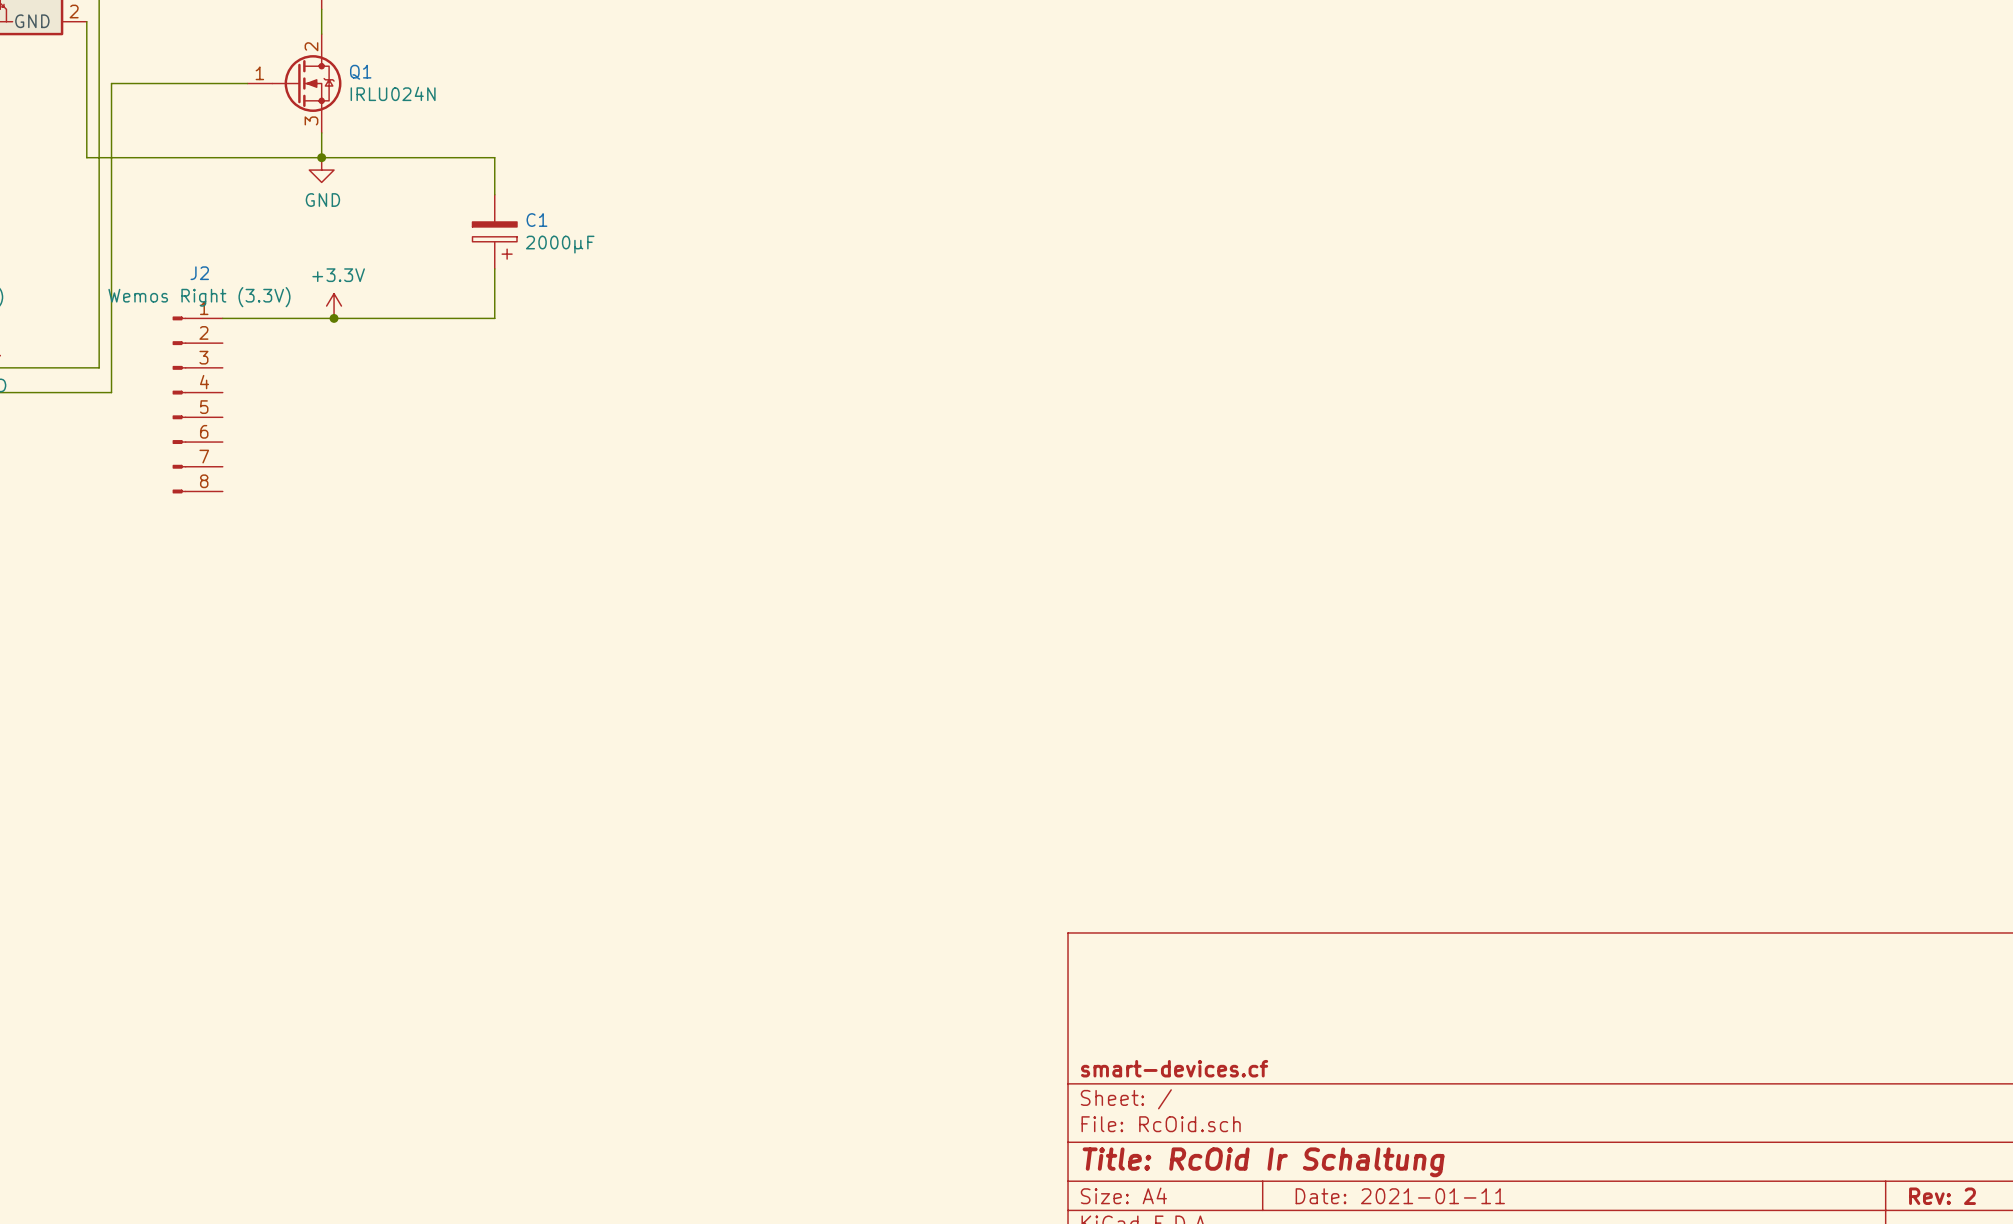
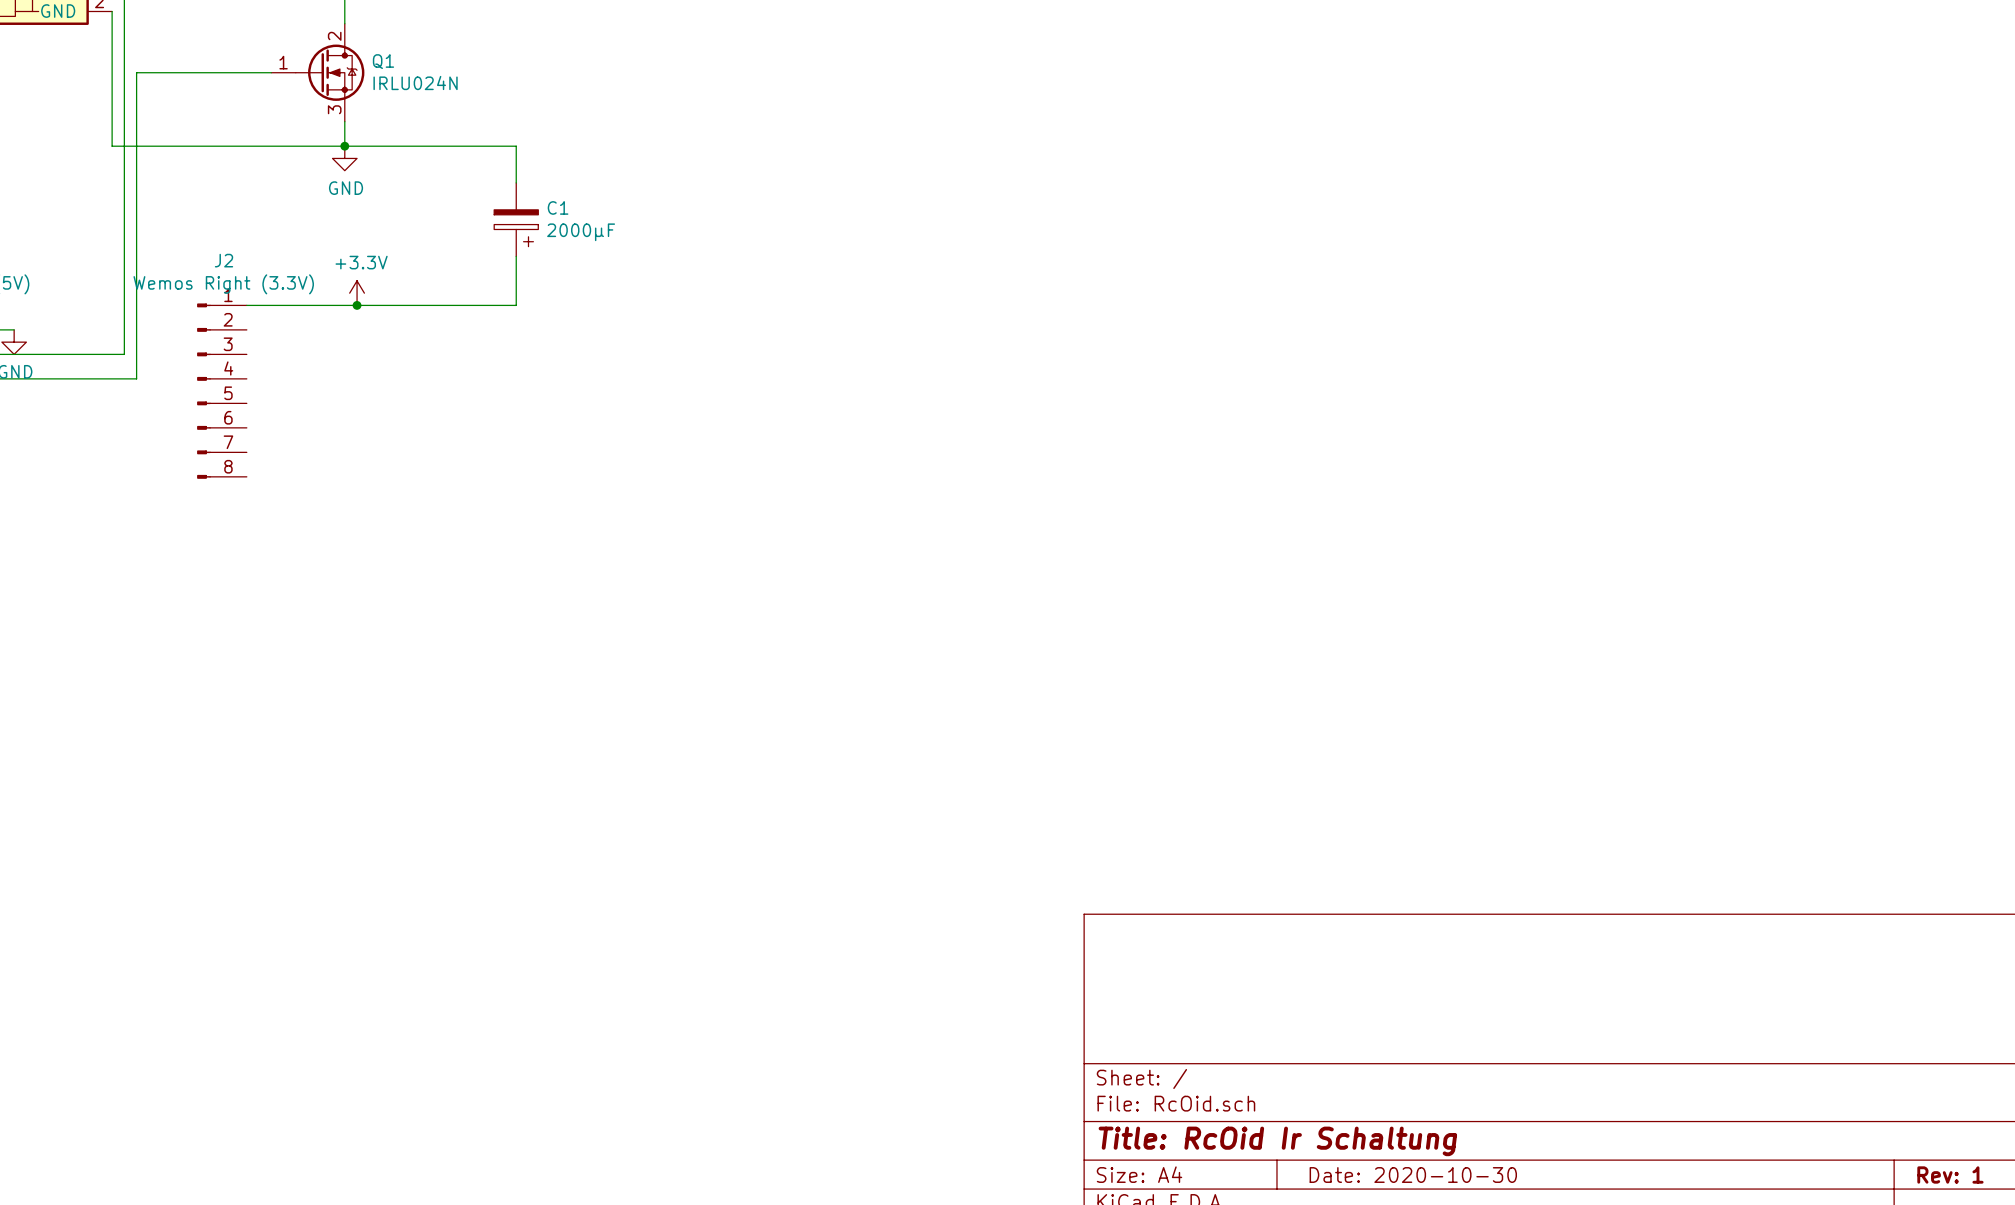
title block: smart-devices.cf (1174, 1068) -> none
title block: Date: 2021-01-11 (1400, 1196) -> Date: 2020-10-30 (1413, 1175)
title block: Rev: 2 (1942, 1196) -> Rev: 1 (1950, 1175)

